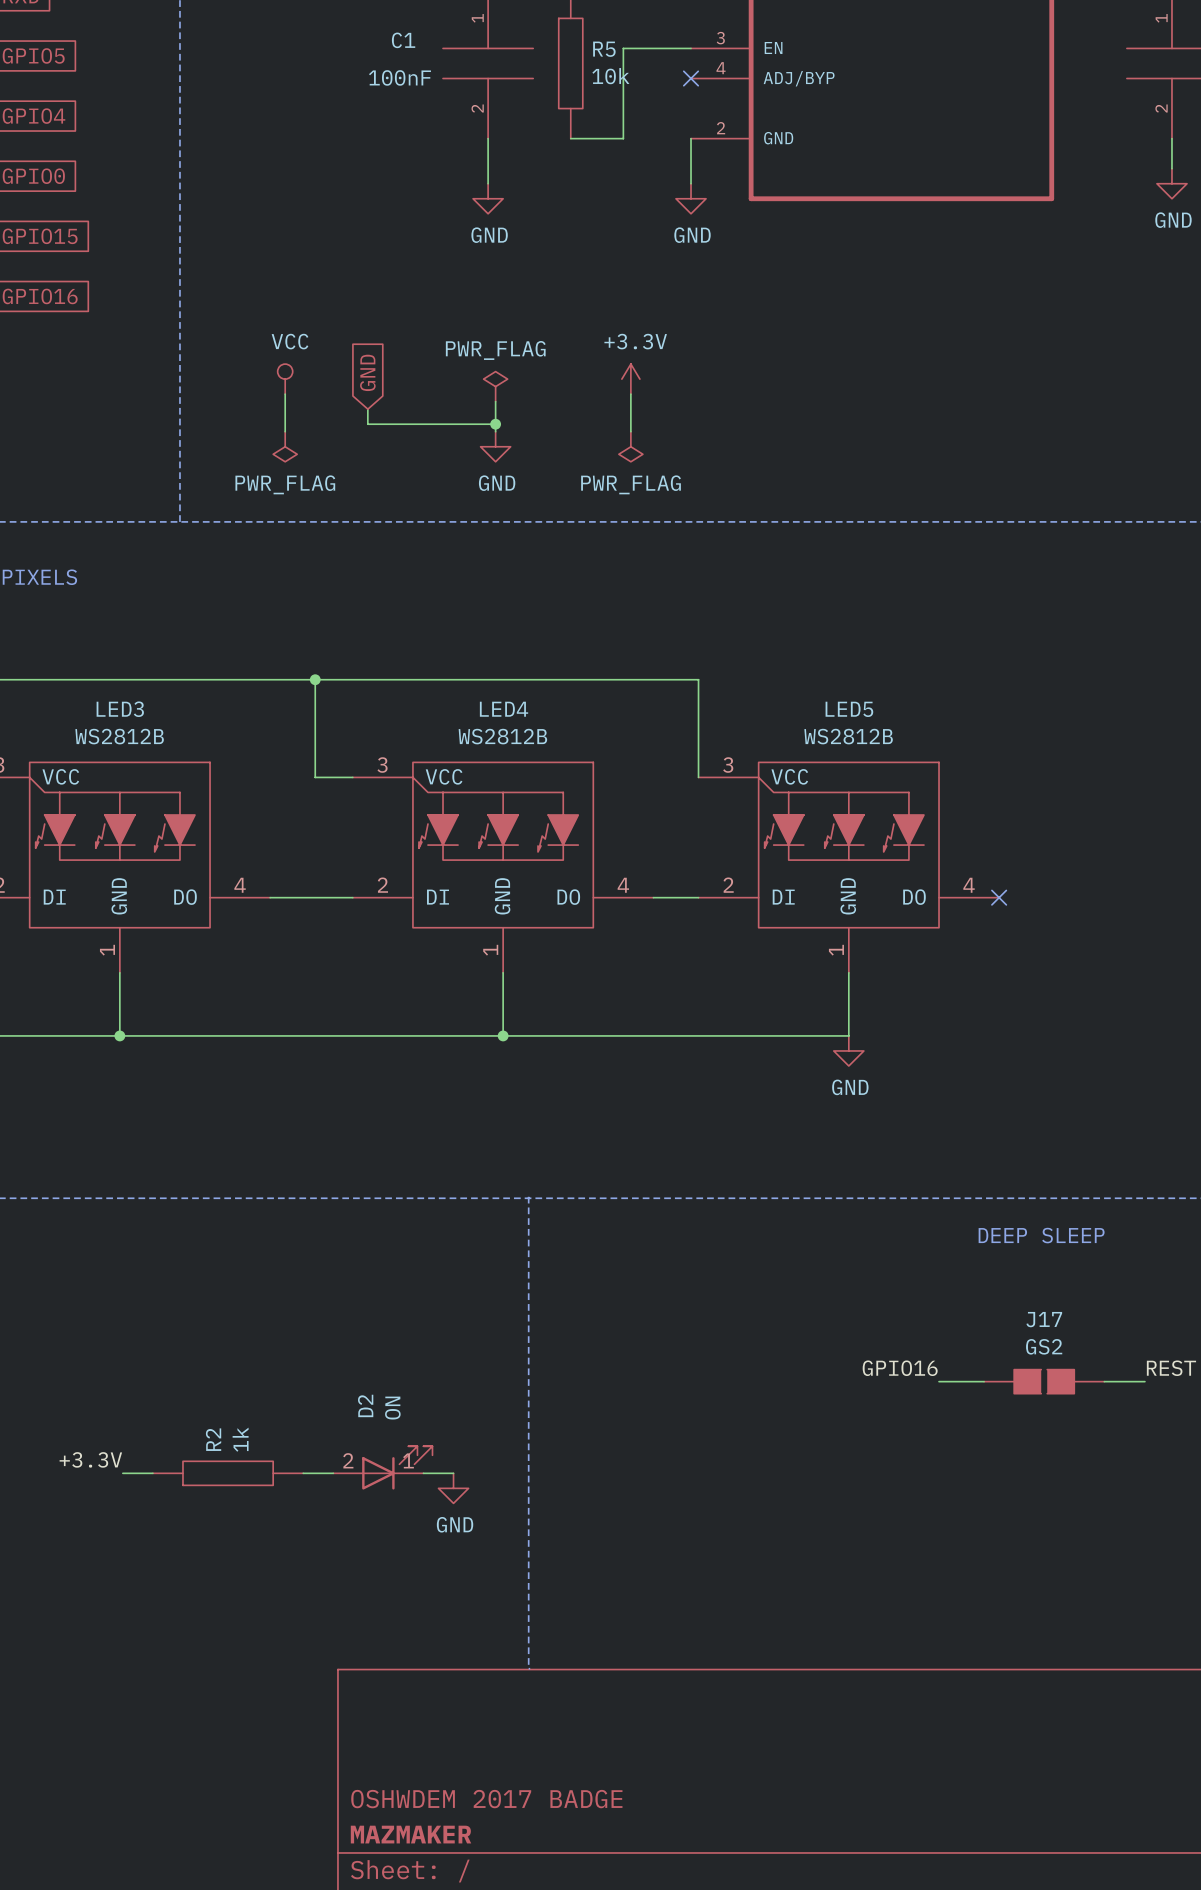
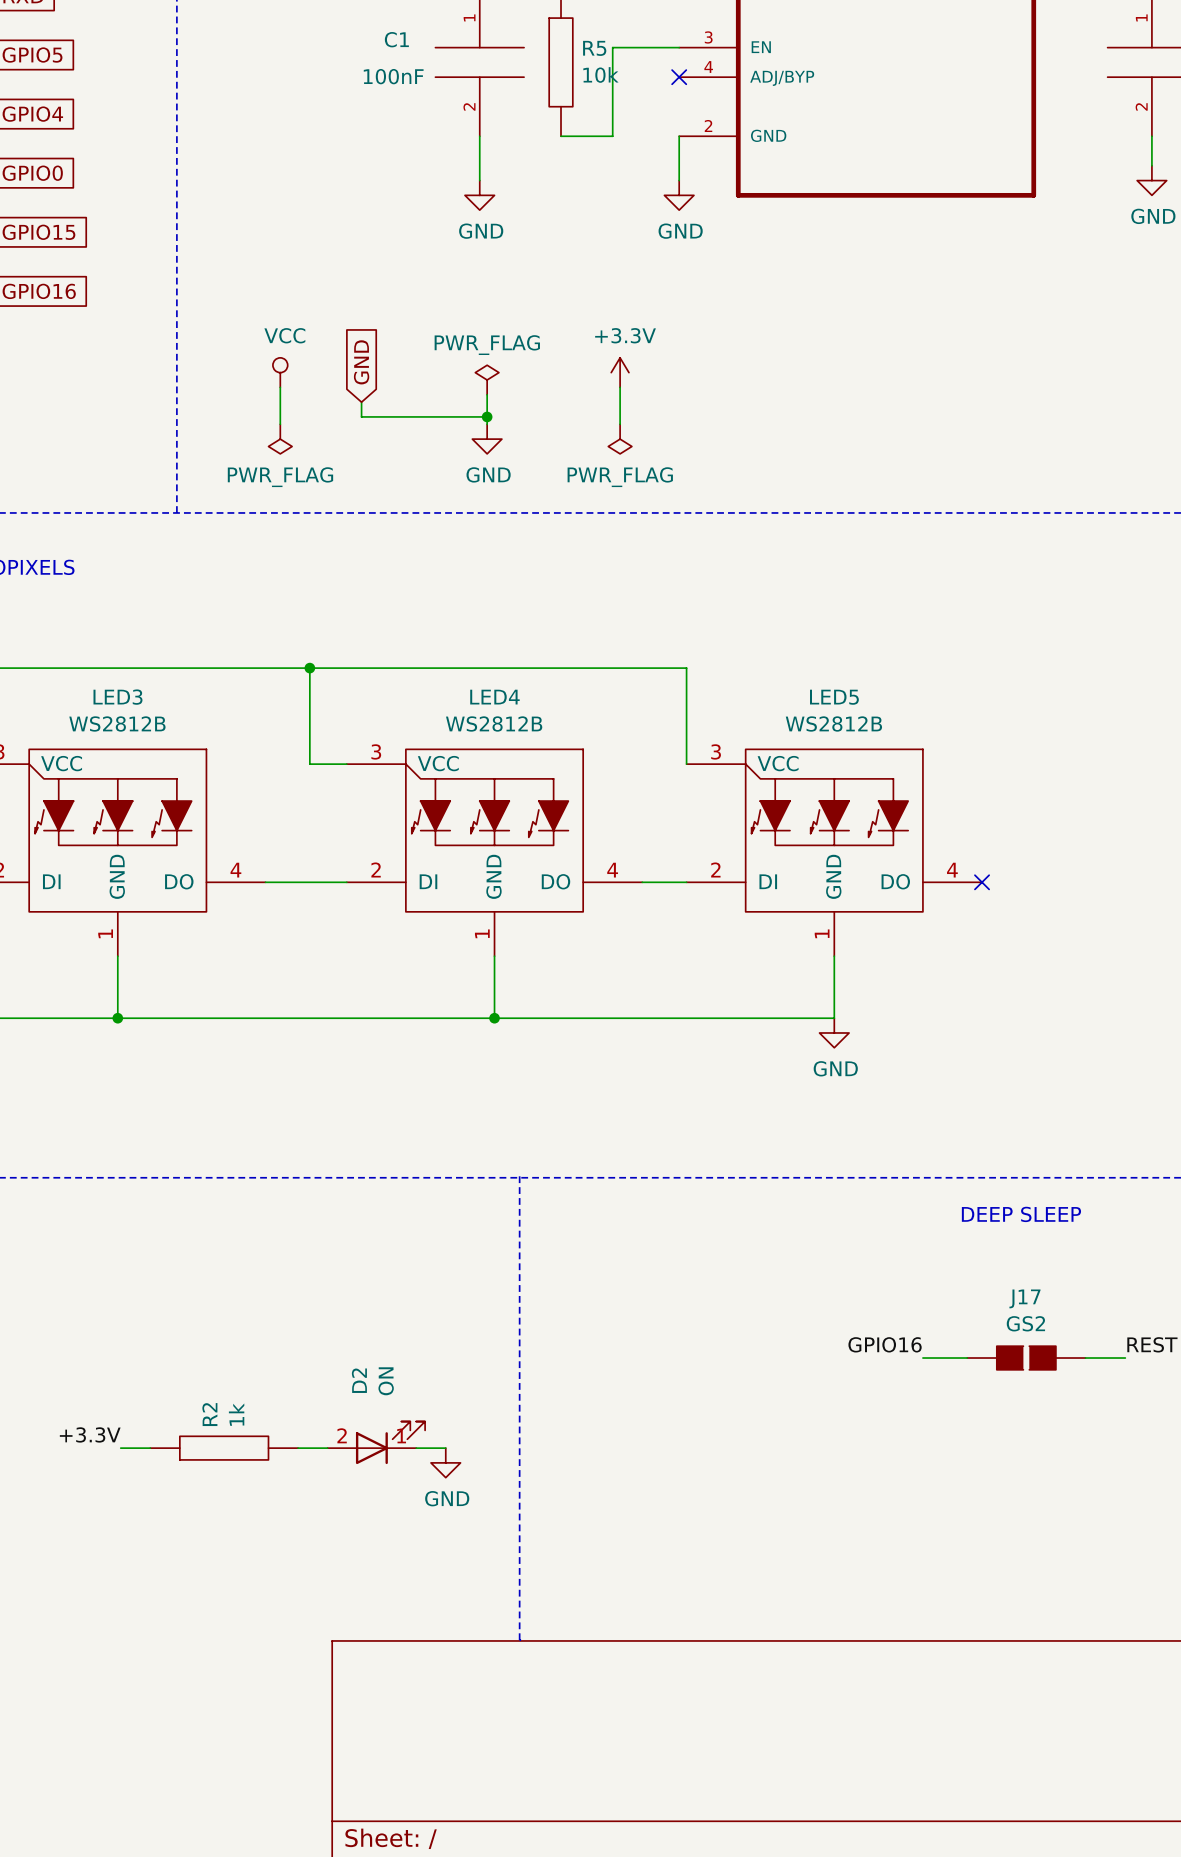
title block: OSHWDEM 2017 BADGE (486, 1799) -> none
title block: MAZMAKER (411, 1834) -> none

